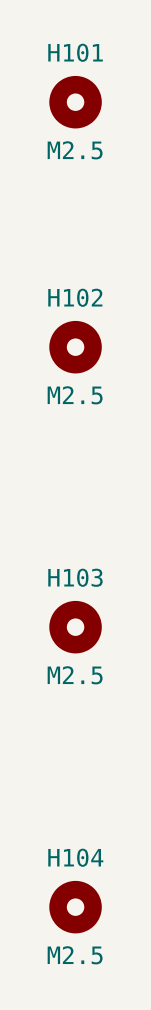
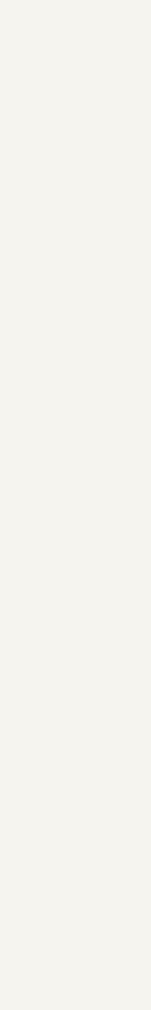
H101: M2.5 (75, 102) -> none
H102: M2.5 (75, 347) -> none
H103: M2.5 (75, 627) -> none
H104: M2.5 (75, 907) -> none

